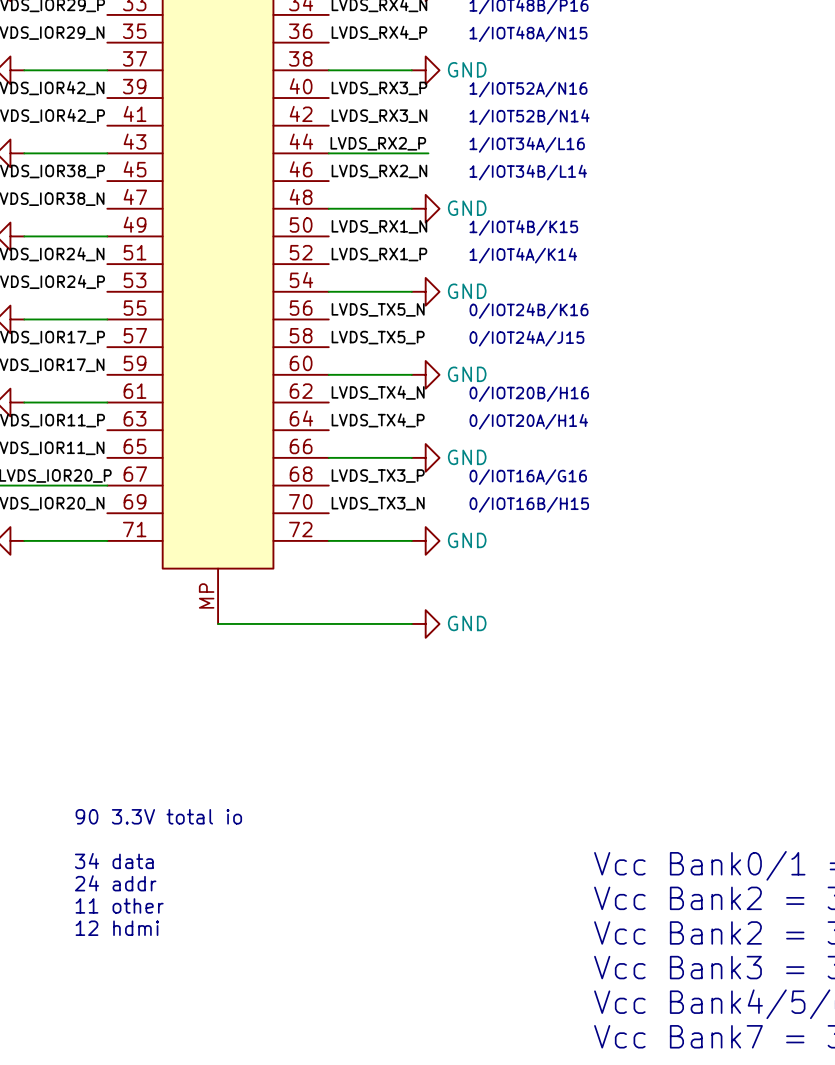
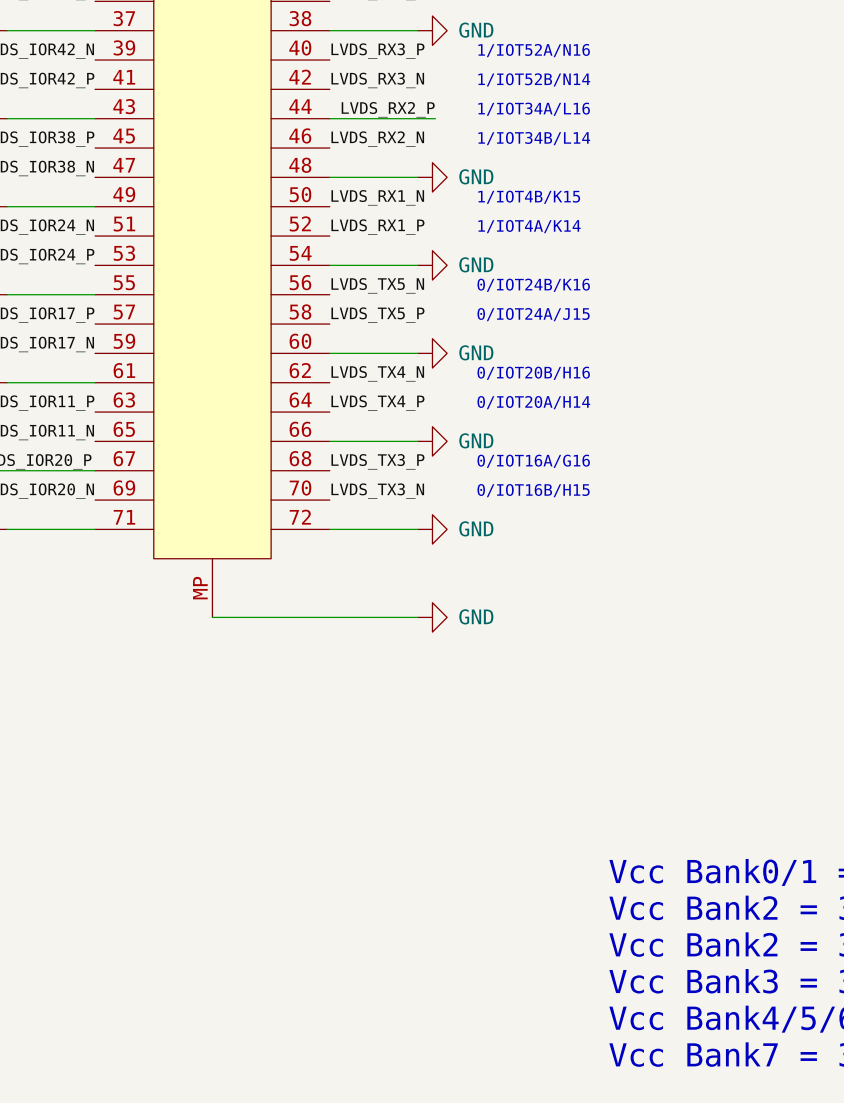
text: 90 3.3V total io (158, 816) -> none
text: 34 data (114, 861) -> none
text: 24 addr (115, 883) -> none
text: 11 other (119, 905) -> none
text: 12 hdmi (117, 928) -> none

